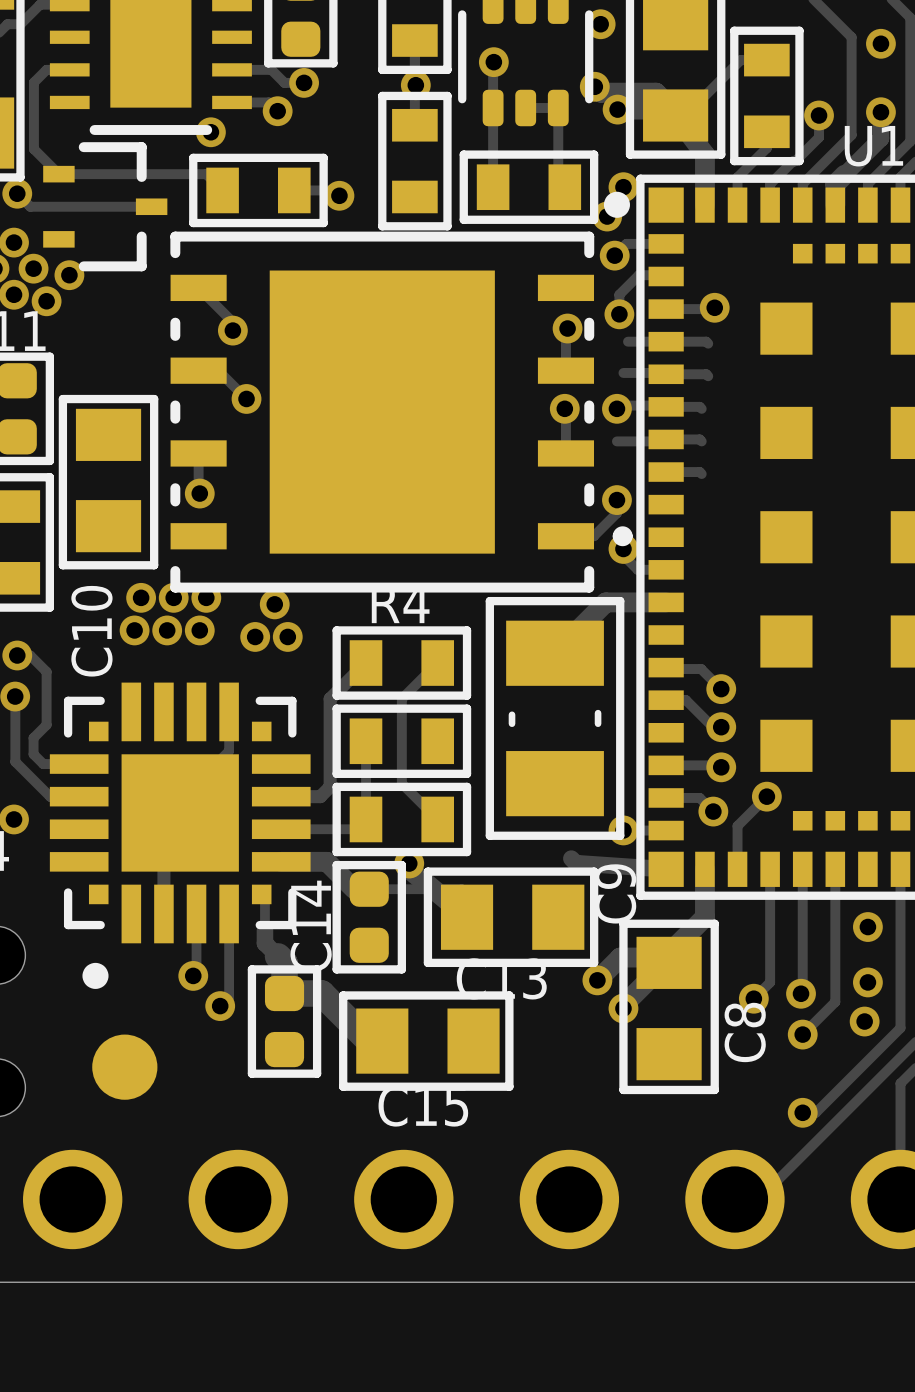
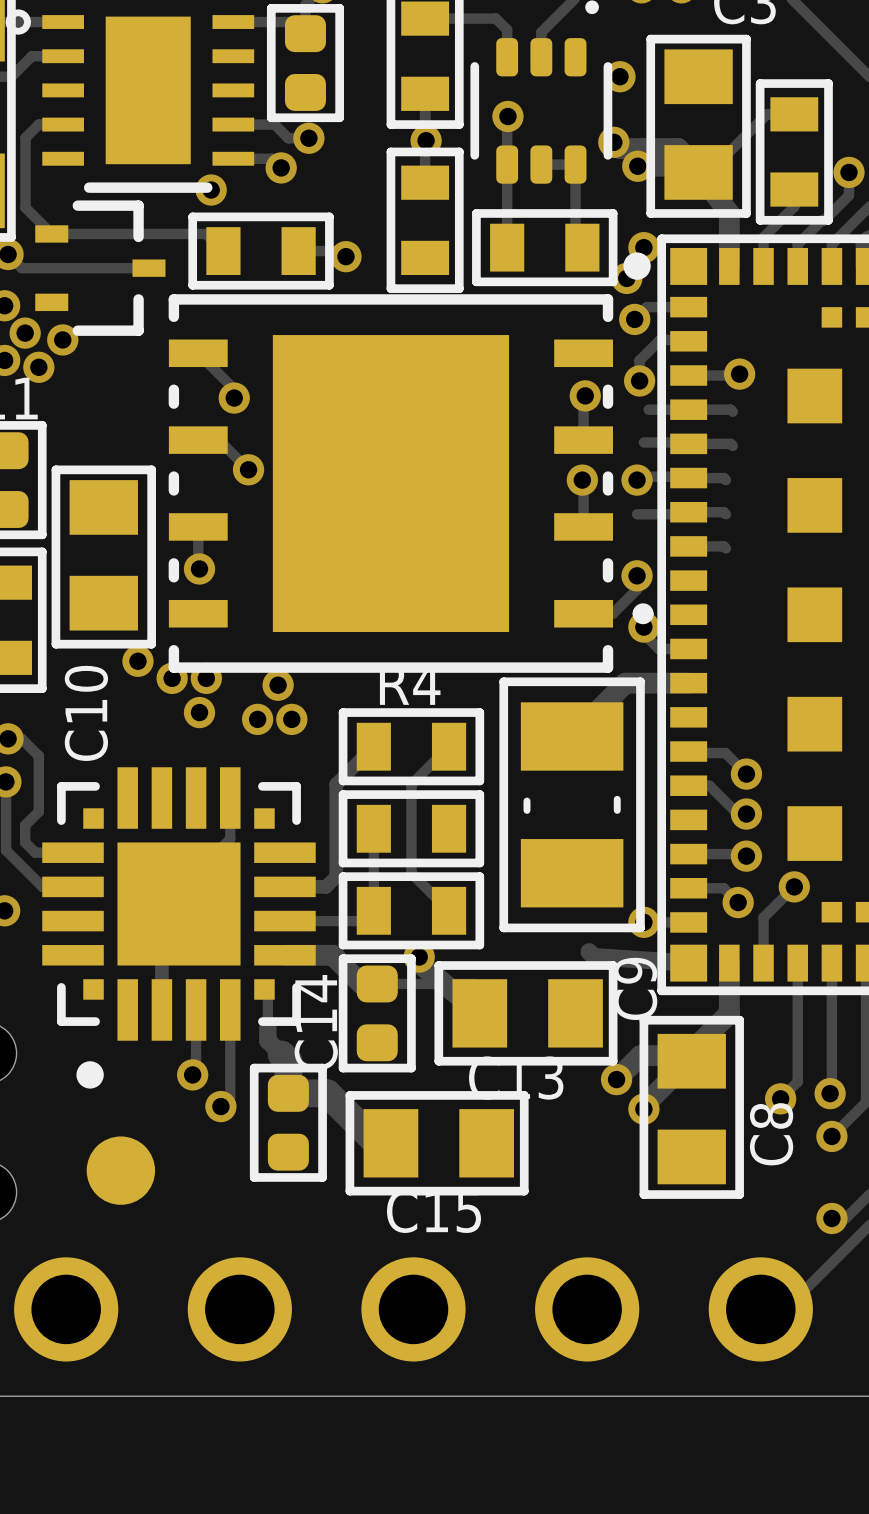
via position: (141, 597) -> (137, 661)
via: (134, 630) -> none
via: (167, 630) -> none

